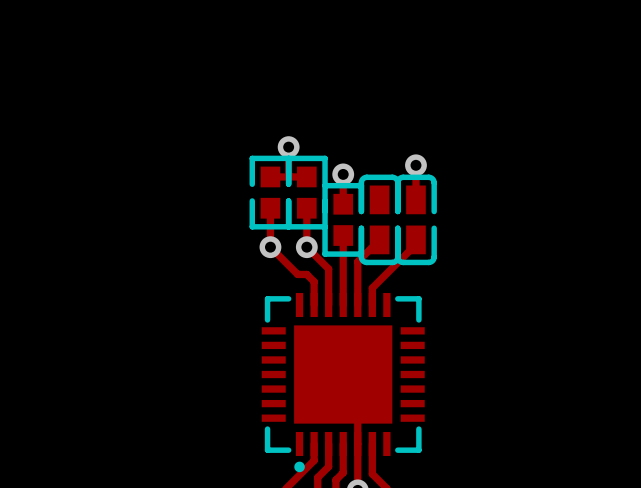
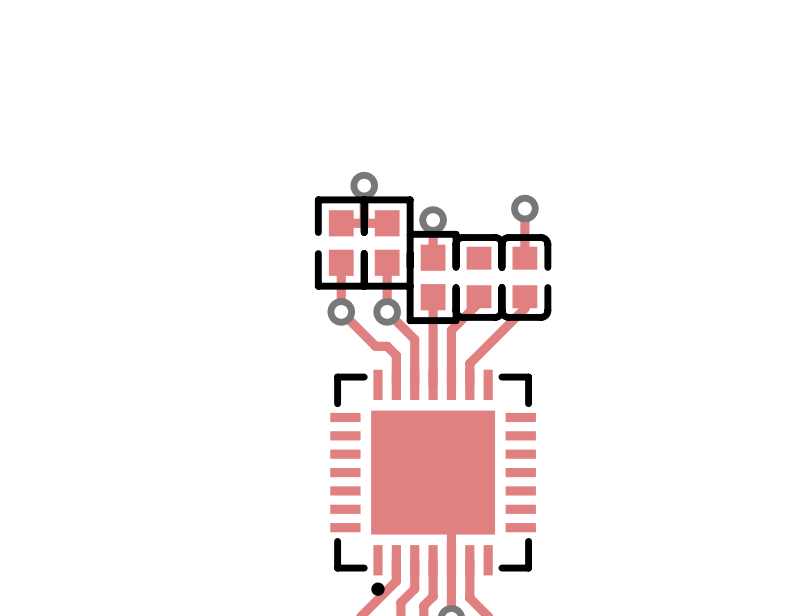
part footprint: [358, 174, 401, 266] -> [452, 234, 506, 321]
part footprint: [395, 174, 437, 266] -> [498, 234, 552, 321]

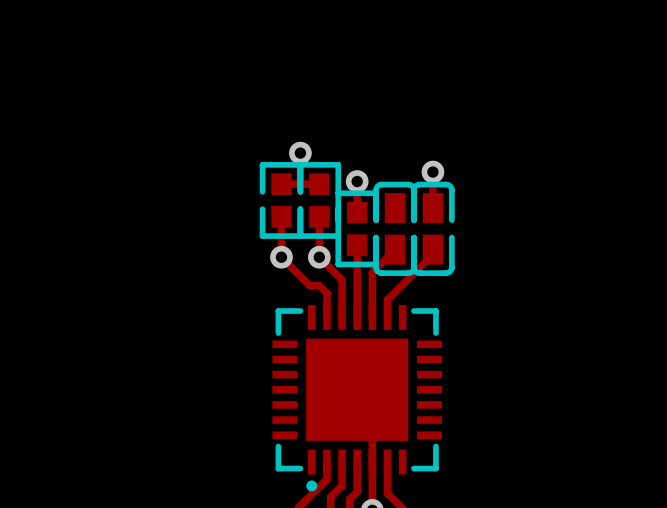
part footprint: [452, 234, 506, 321] -> [373, 181, 417, 276]
part footprint: [498, 234, 552, 321] -> [411, 181, 455, 276]

